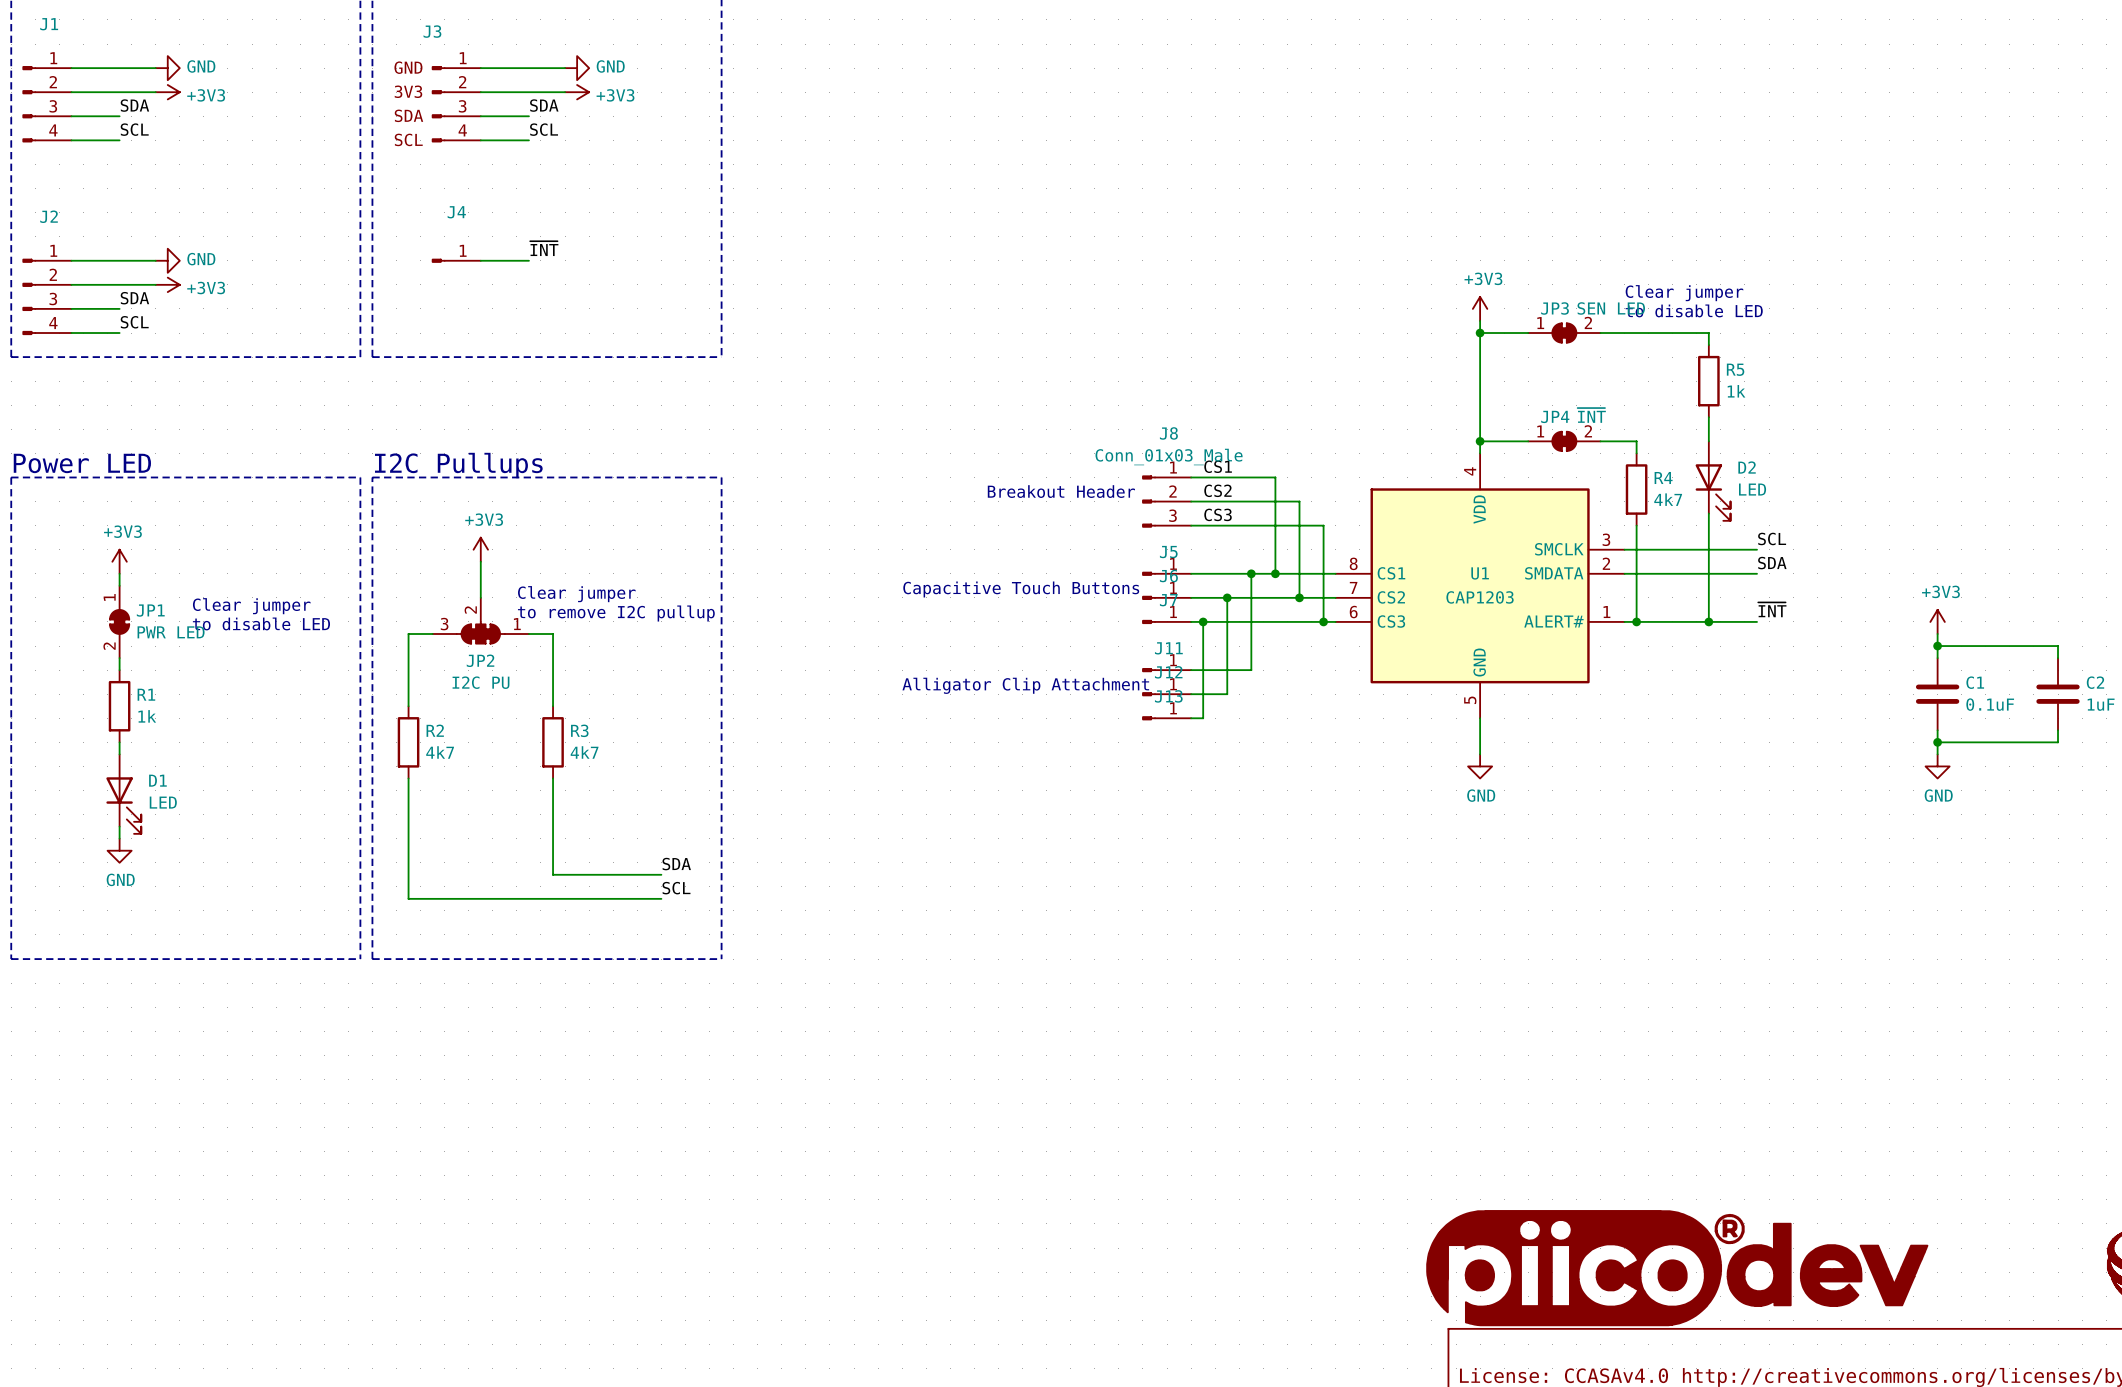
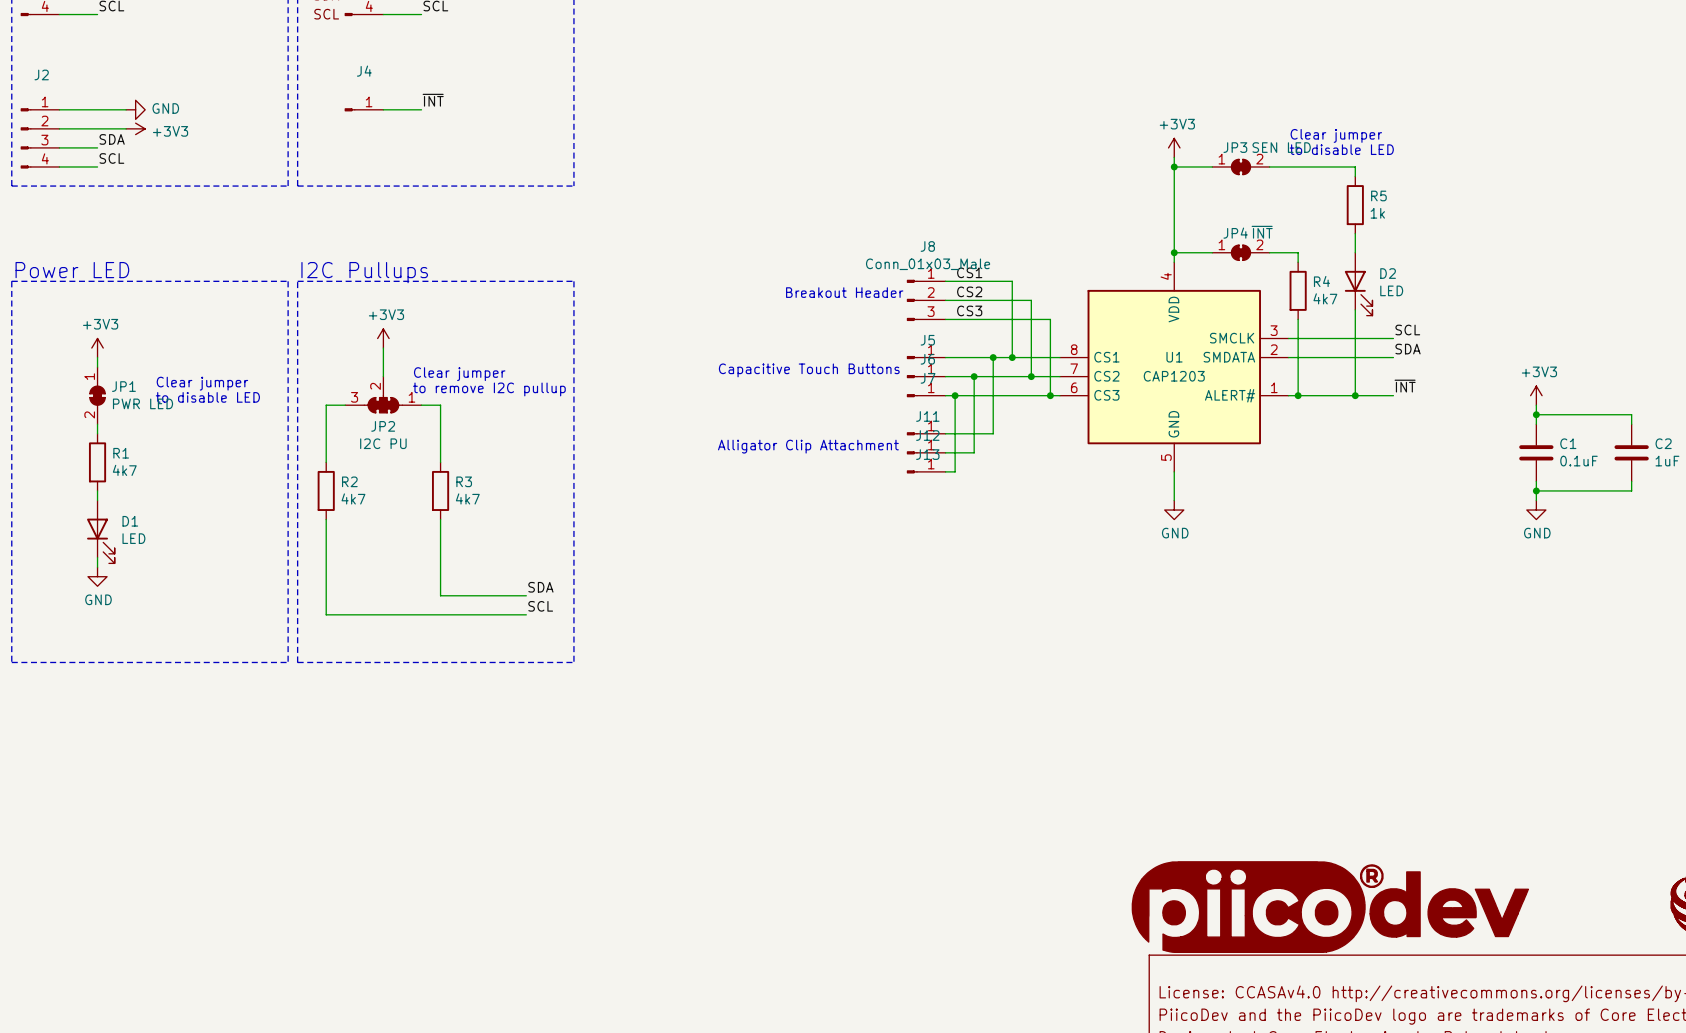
R1 value: 1k (147, 716) -> 4k7 (124, 470)

